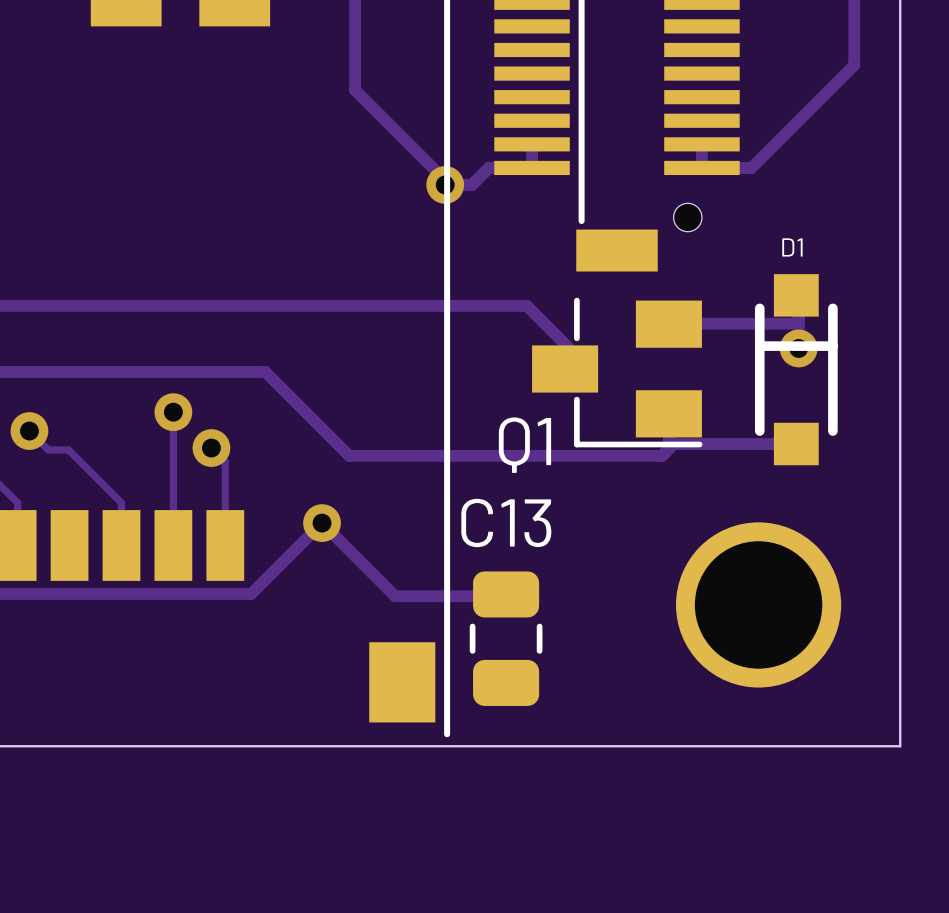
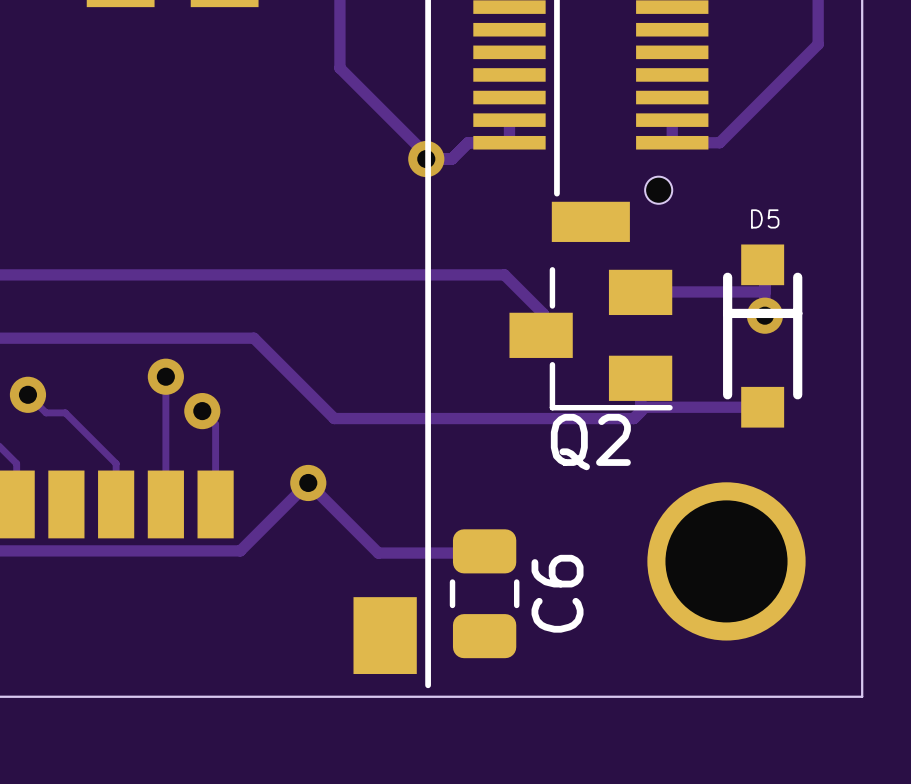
D1 name: D1 (792, 247) -> D5 (765, 218)
Q1 name: Q1 (524, 445) -> Q2 (590, 442)
C13 name: C13 (506, 523) -> C6 (557, 593)

